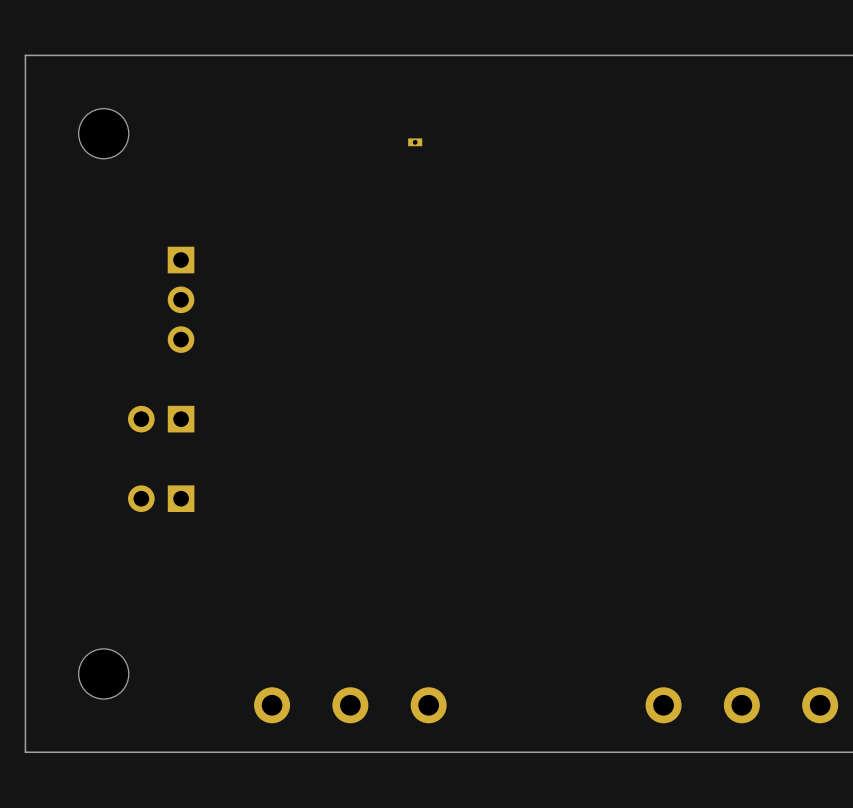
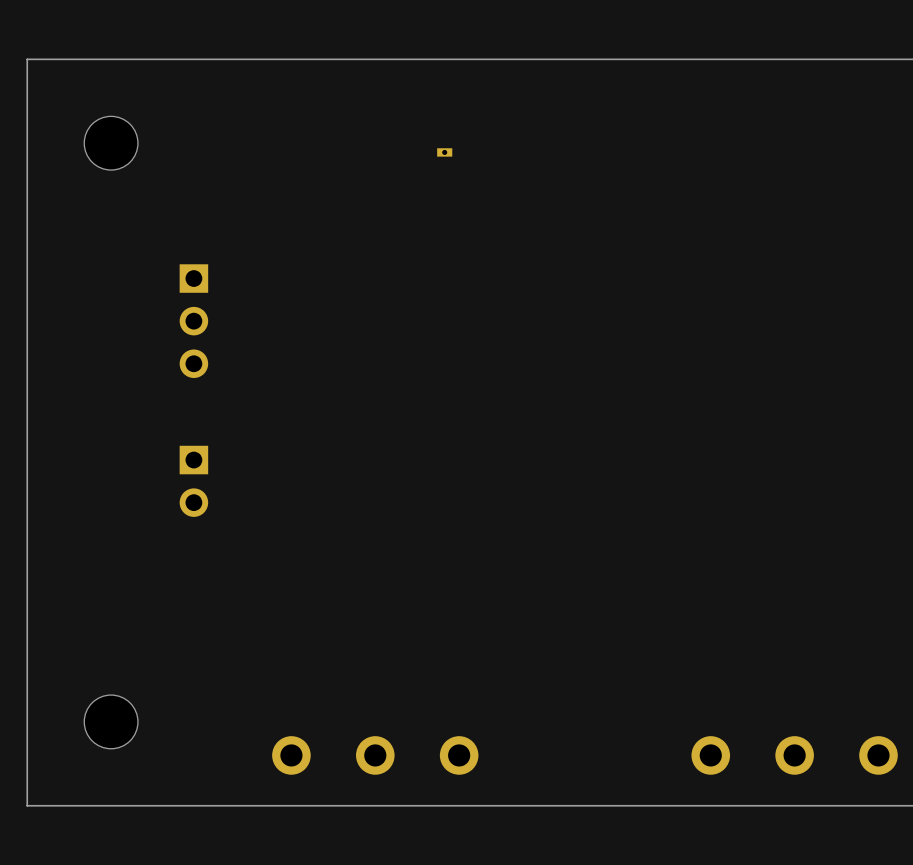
part: (161, 419) -> none
part: none -> (193, 481)
part: (161, 498) -> none

